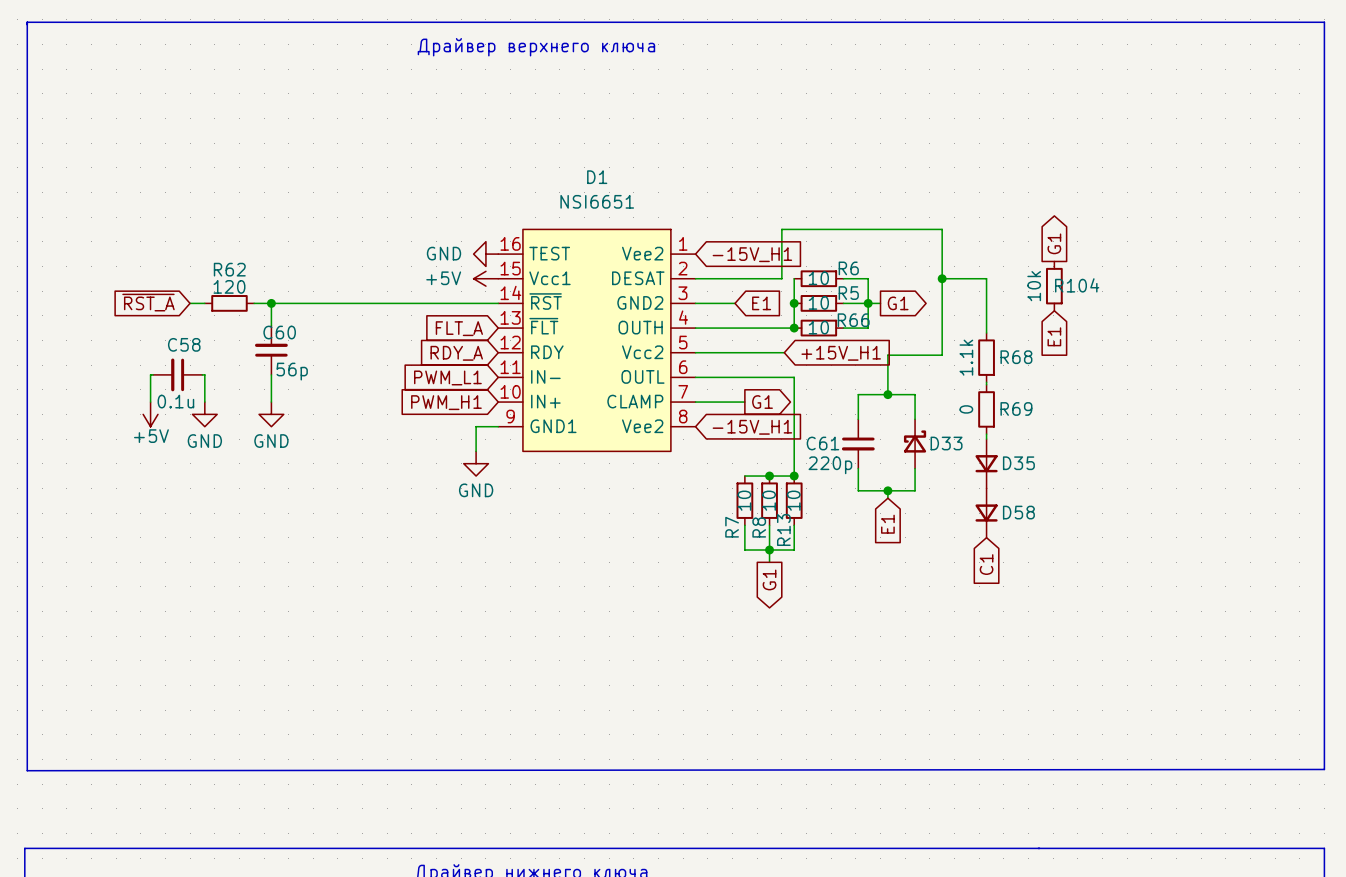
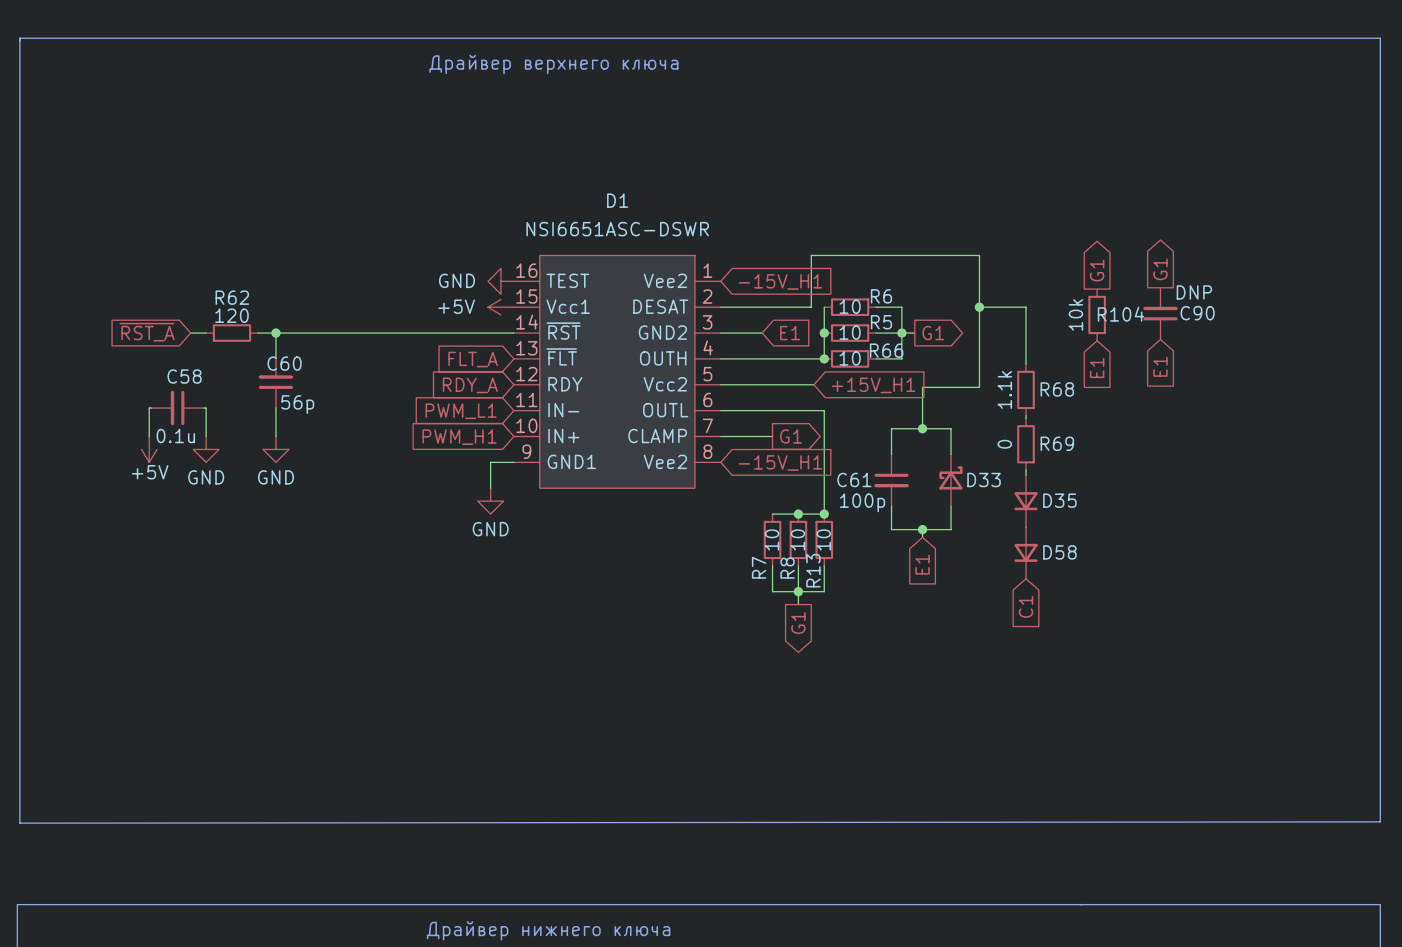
D1 value: NSI6651 (597, 201) -> NSI6651ASC-DSWR (617, 229)
global label: none -> G1 (1160, 269)
C90: none -> DNP (1160, 313)
global label: none -> E1 (1160, 366)
C61 value: 220p (830, 465) -> 100p (862, 502)

